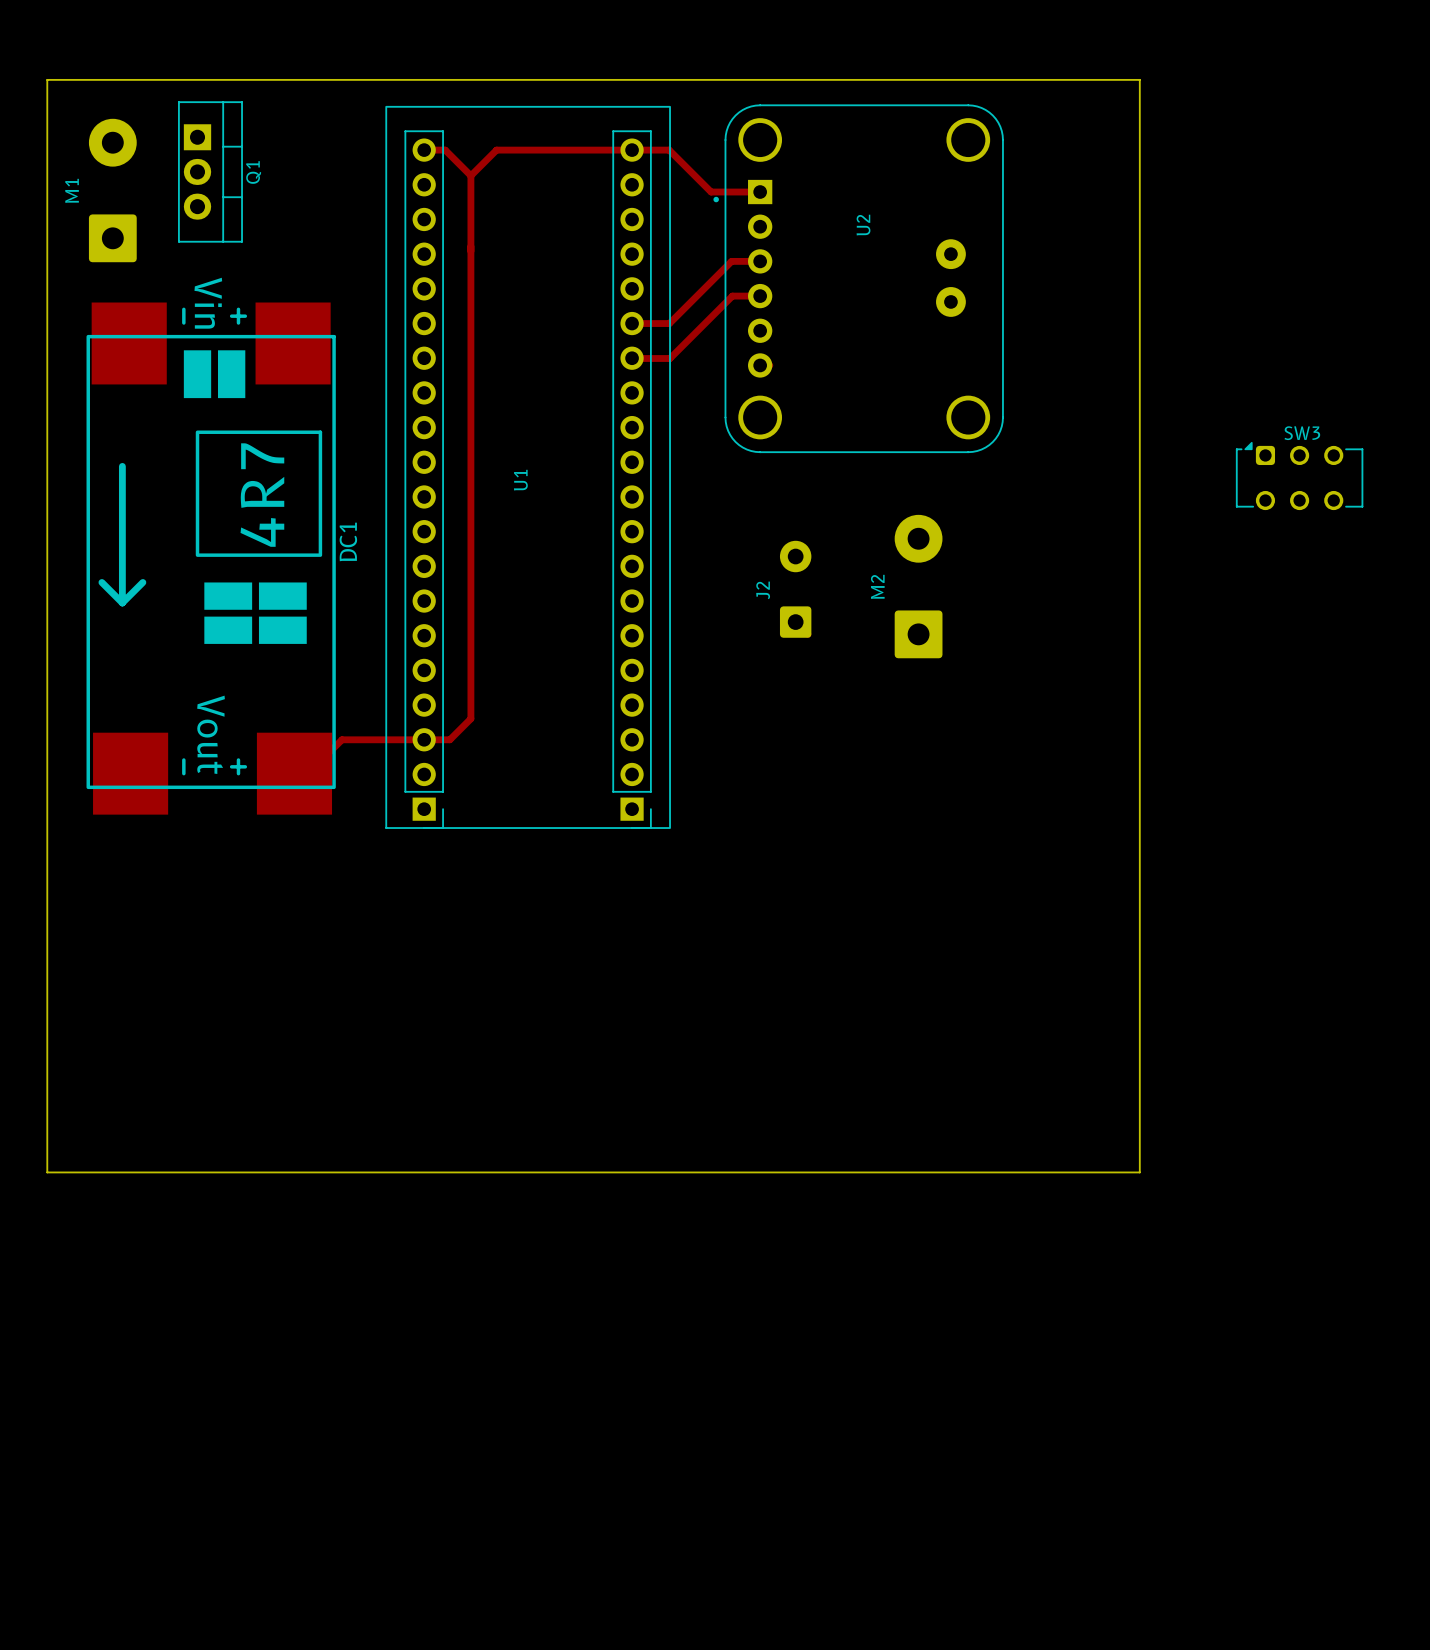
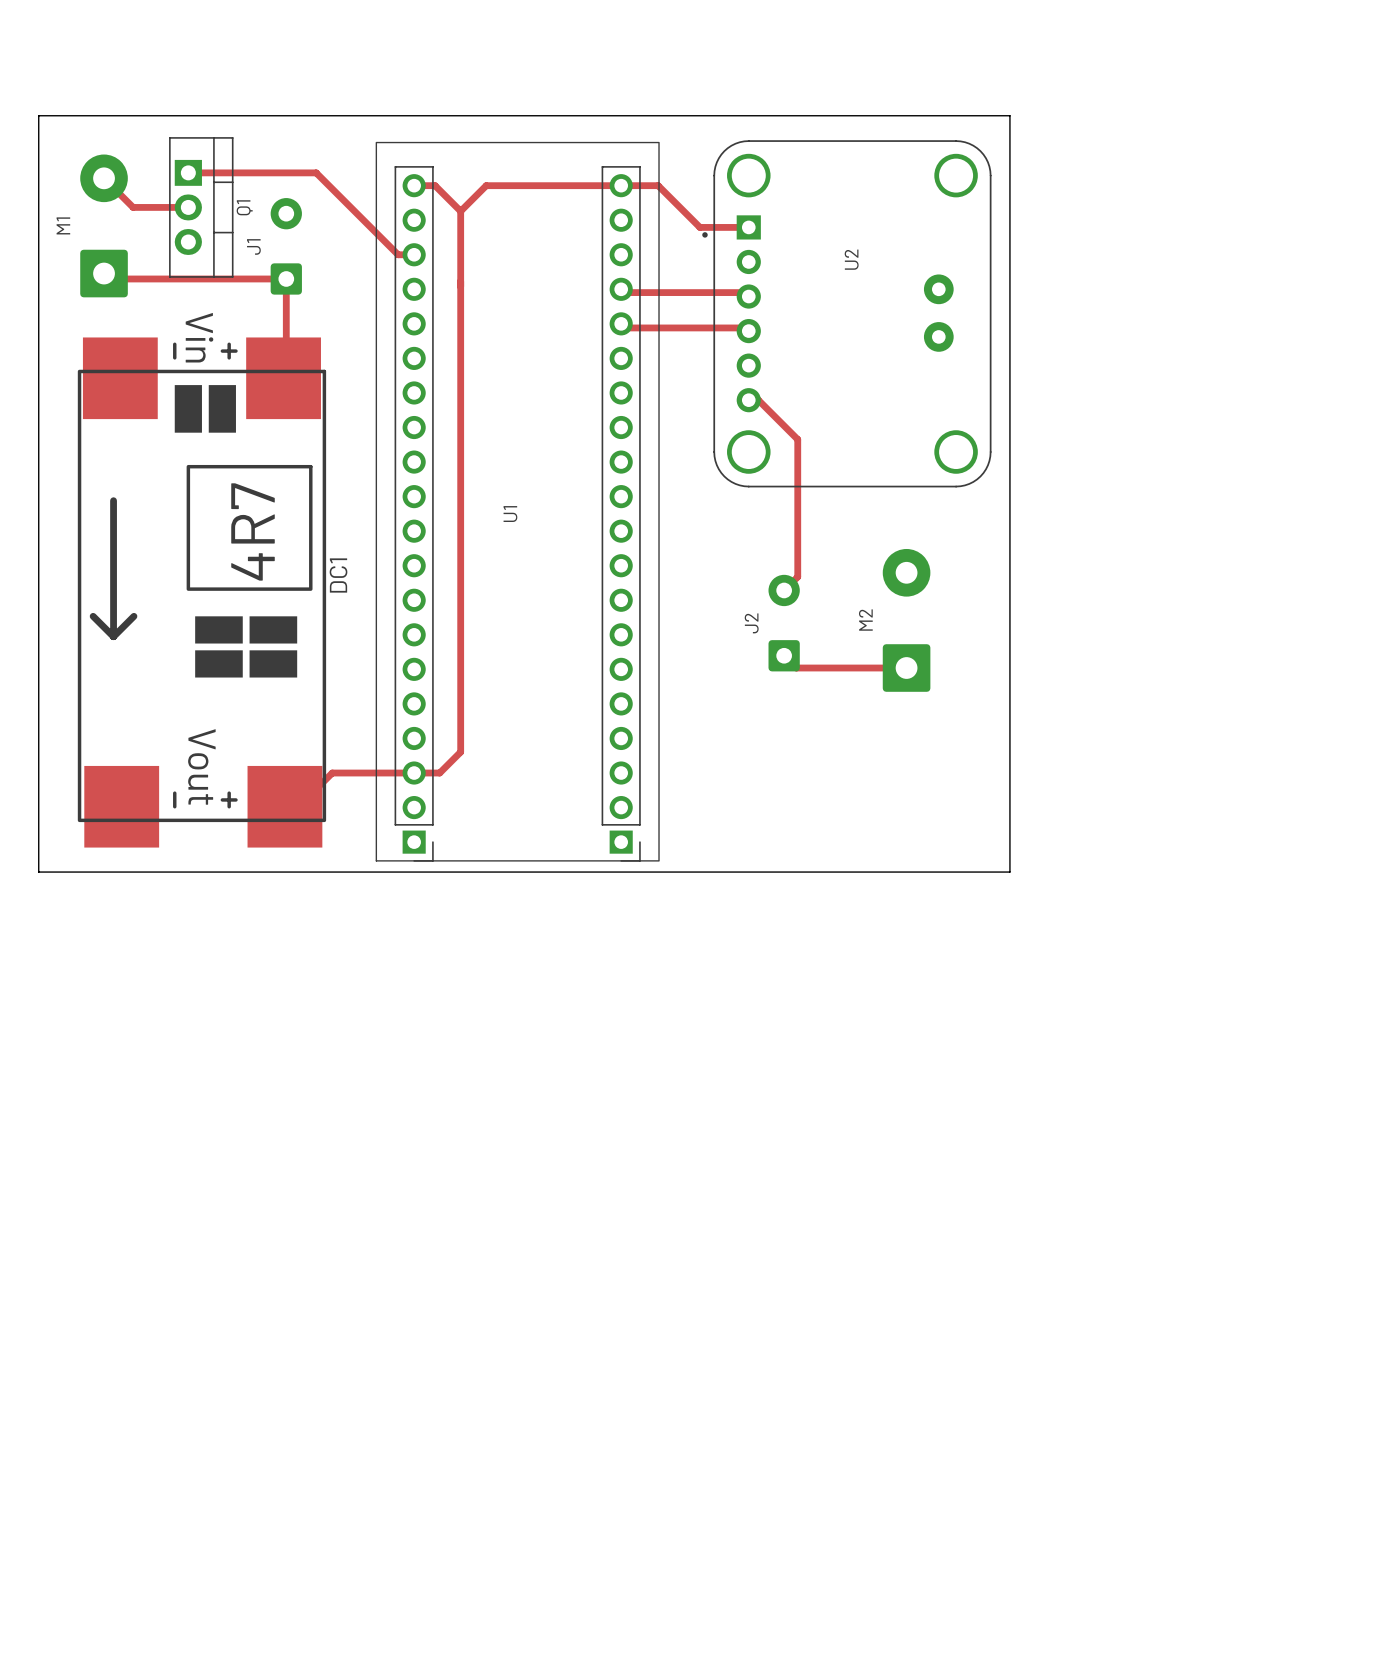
board edge: (1022, 79) (1139, 79) (1139, 1172) (47, 1172) (47, 839) -> (1009, 115) (1009, 872) (38, 872)
track: none -> (188, 172) (316, 172) (398, 254) (414, 254)
track: none -> (104, 178) (133, 207) (188, 207)
J1: none -> (286, 246)
track: none -> (109, 278) (286, 278) (286, 375)
track: none -> (624, 292) (744, 292)
track: (760, 261) (731, 261) (669, 323) (632, 323) -> none
track: none -> (625, 327) (745, 327)
track: (760, 296) (732, 296) (670, 358) (632, 358) -> none
track: none -> (758, 400) (797, 439) (797, 576) (784, 590)
SW3: (1299, 476) -> none
track: none -> (796, 668) (906, 668)

